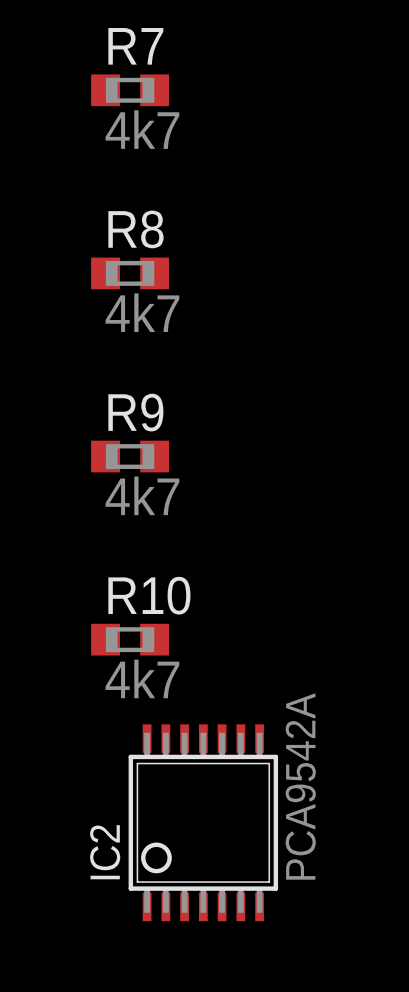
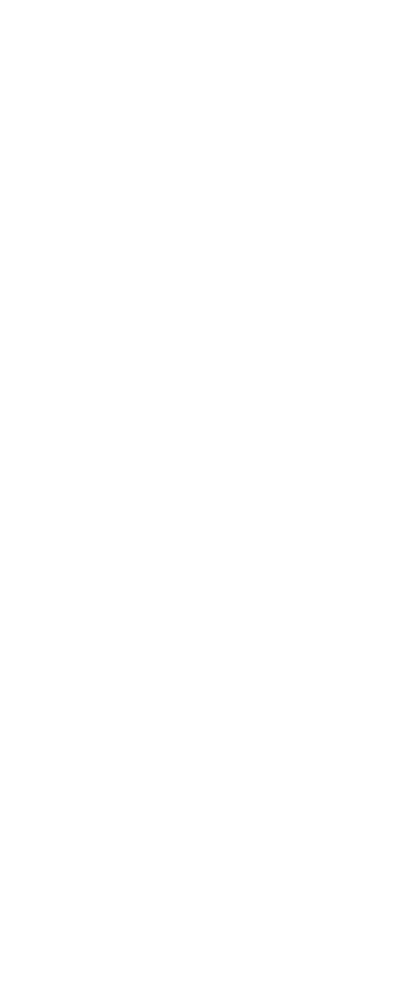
R7: 4k7 (130, 90) -> none
R8: 4k7 (130, 273) -> none
R9: 4k7 (130, 456) -> none
R10: 4k7 (130, 639) -> none
IC2: PCA9542A (203, 822) -> none

